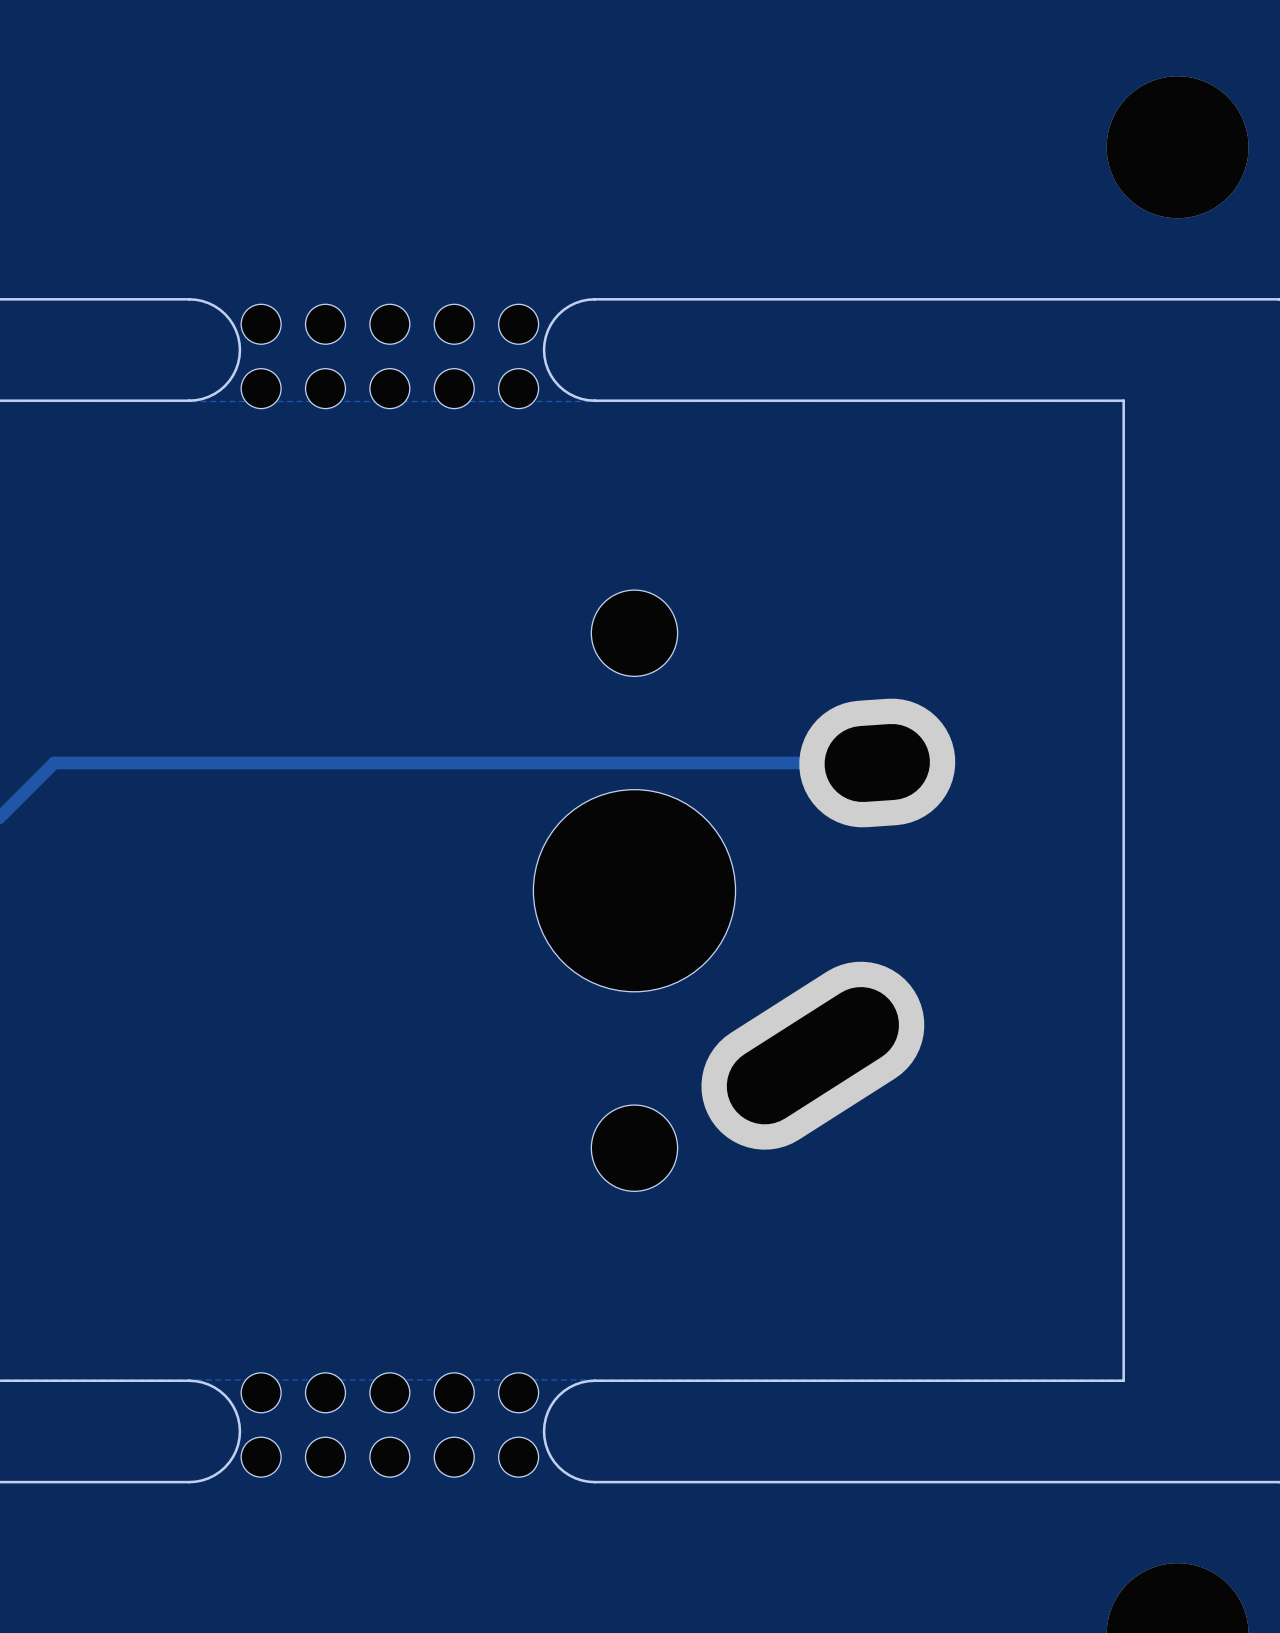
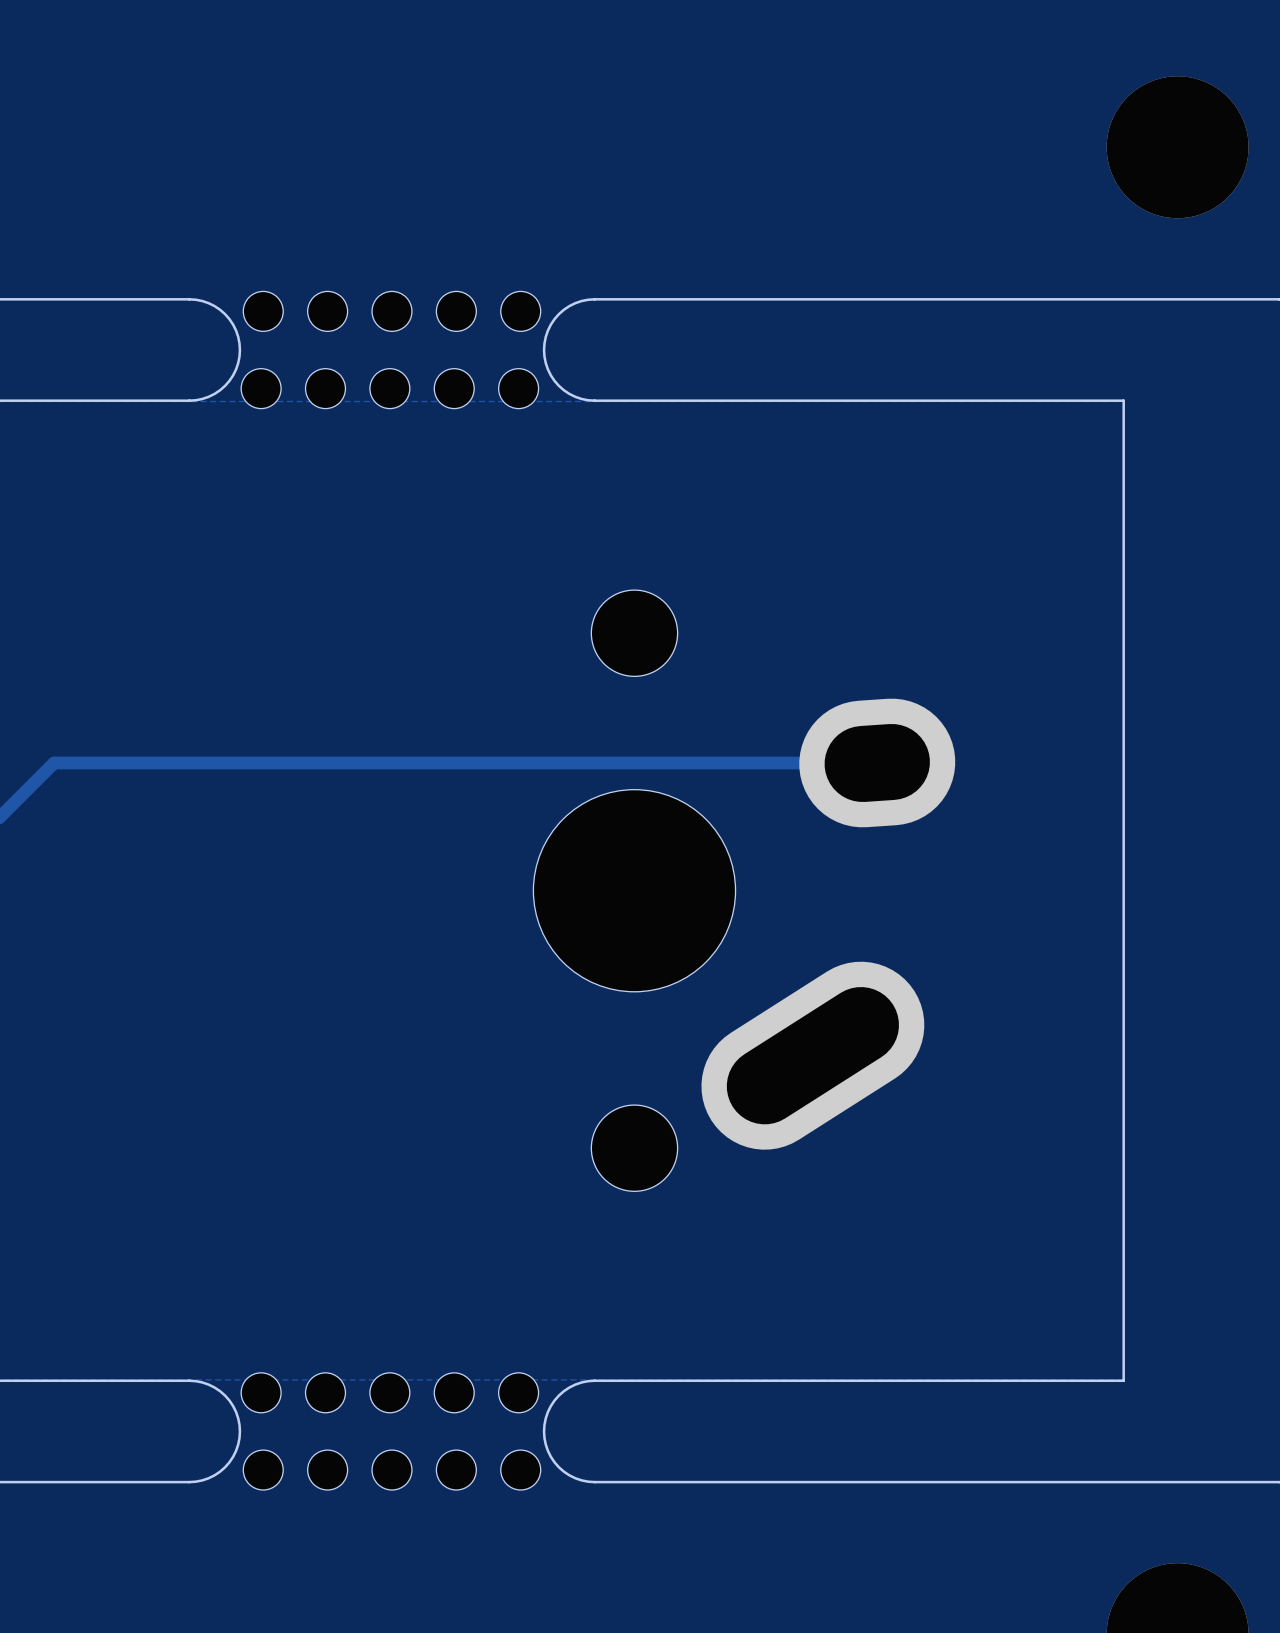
part position: (389, 324) -> (391, 311)
part position: (389, 1457) -> (391, 1470)

